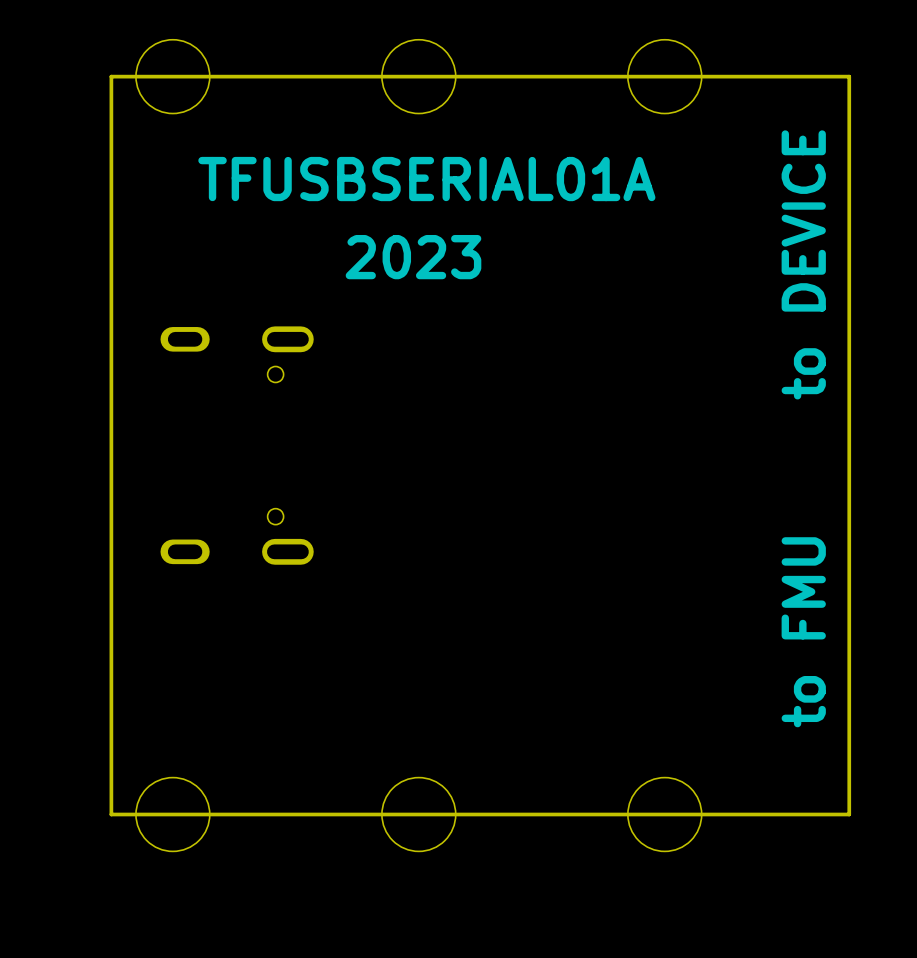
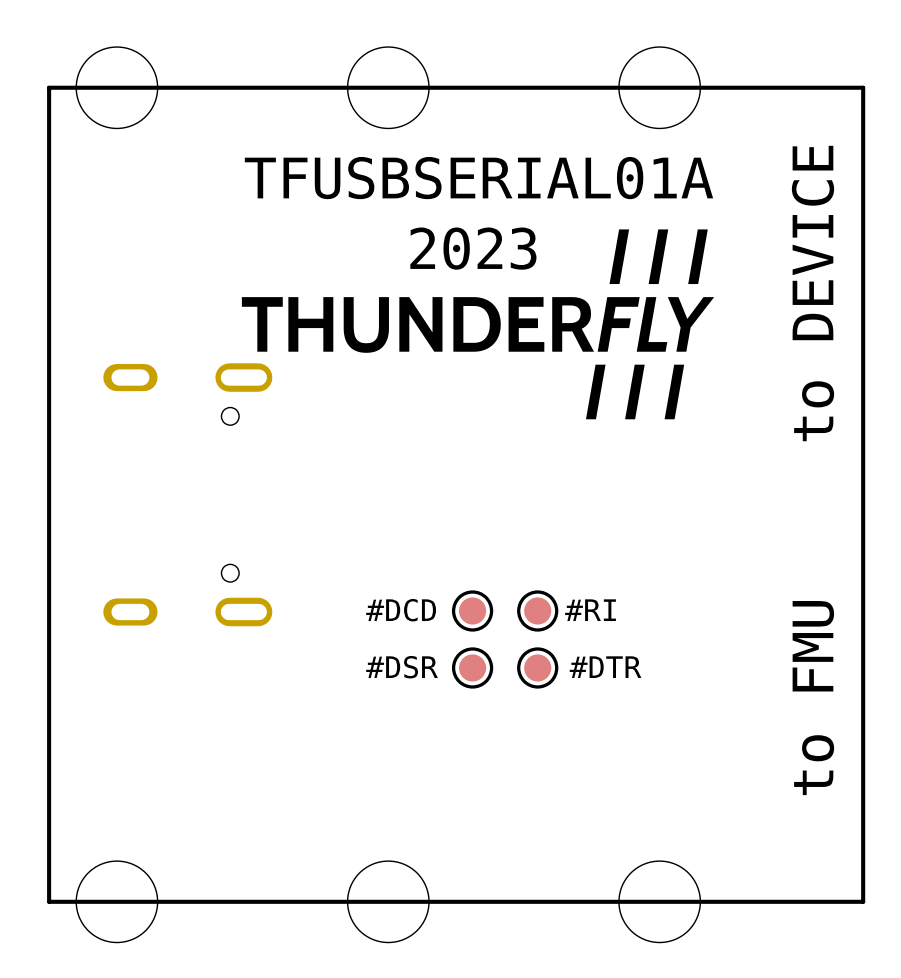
text position: TFUSBSERIAL01A (426, 179) -> TFUSBSERIAL01A (478, 178)
drawing: none -> [241, 229, 715, 420]
text position: 2023 (413, 257) -> 2023 (473, 248)
part: none -> #DCD (472, 611)
part: none -> #RI (537, 611)
part: none -> #DSR (472, 667)
part: none -> #DTR (537, 667)

